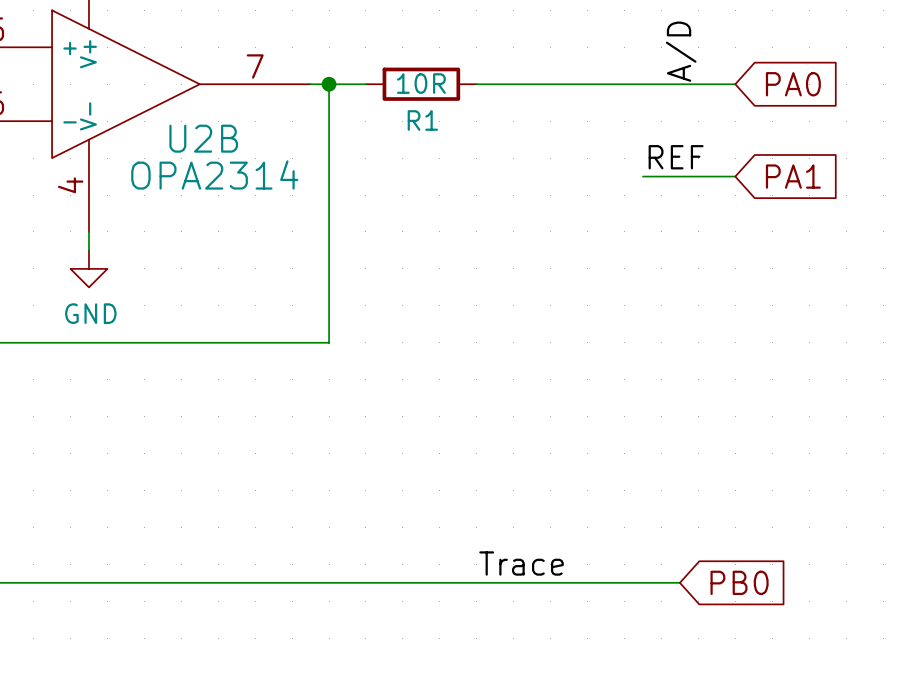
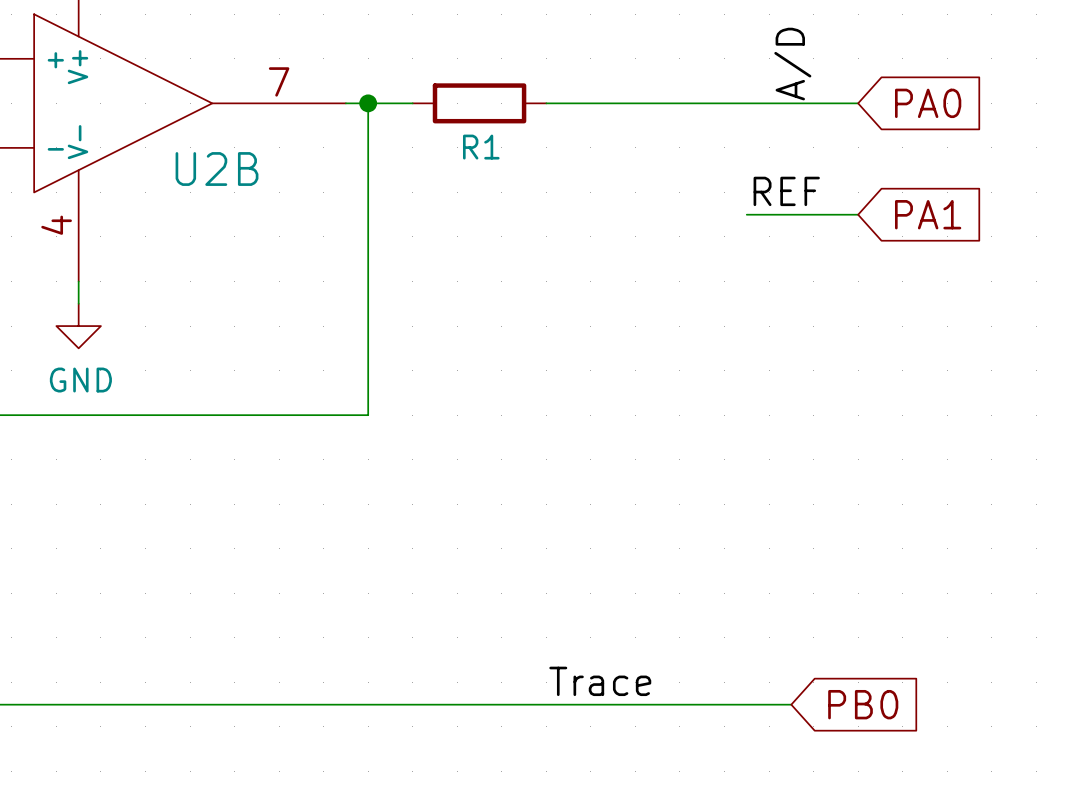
R1 value: 10R (421, 83) -> none
U2B value: OPA2314 (214, 174) -> none

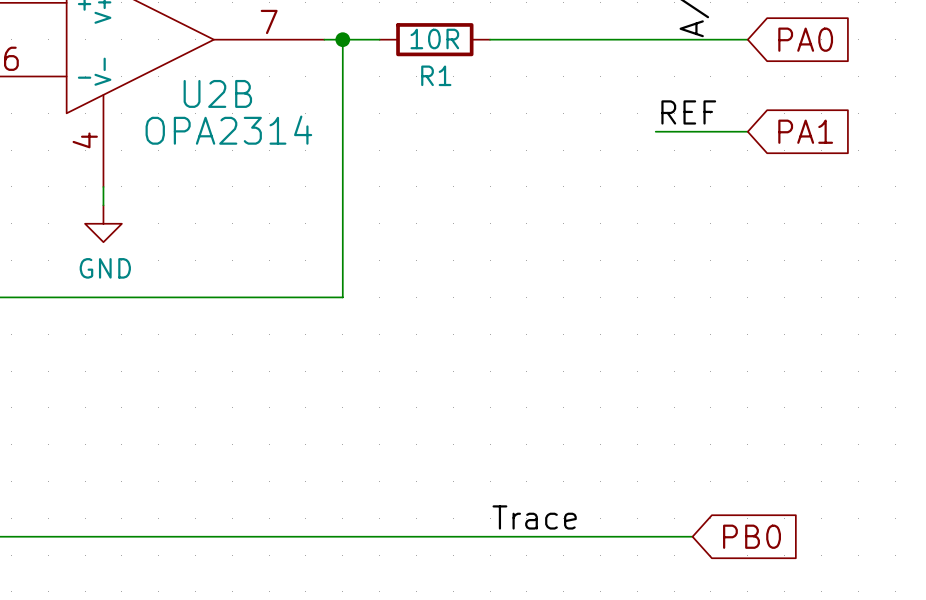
R1 value: none -> 10R (434, 38)
U2B value: none -> OPA2314 (228, 130)

